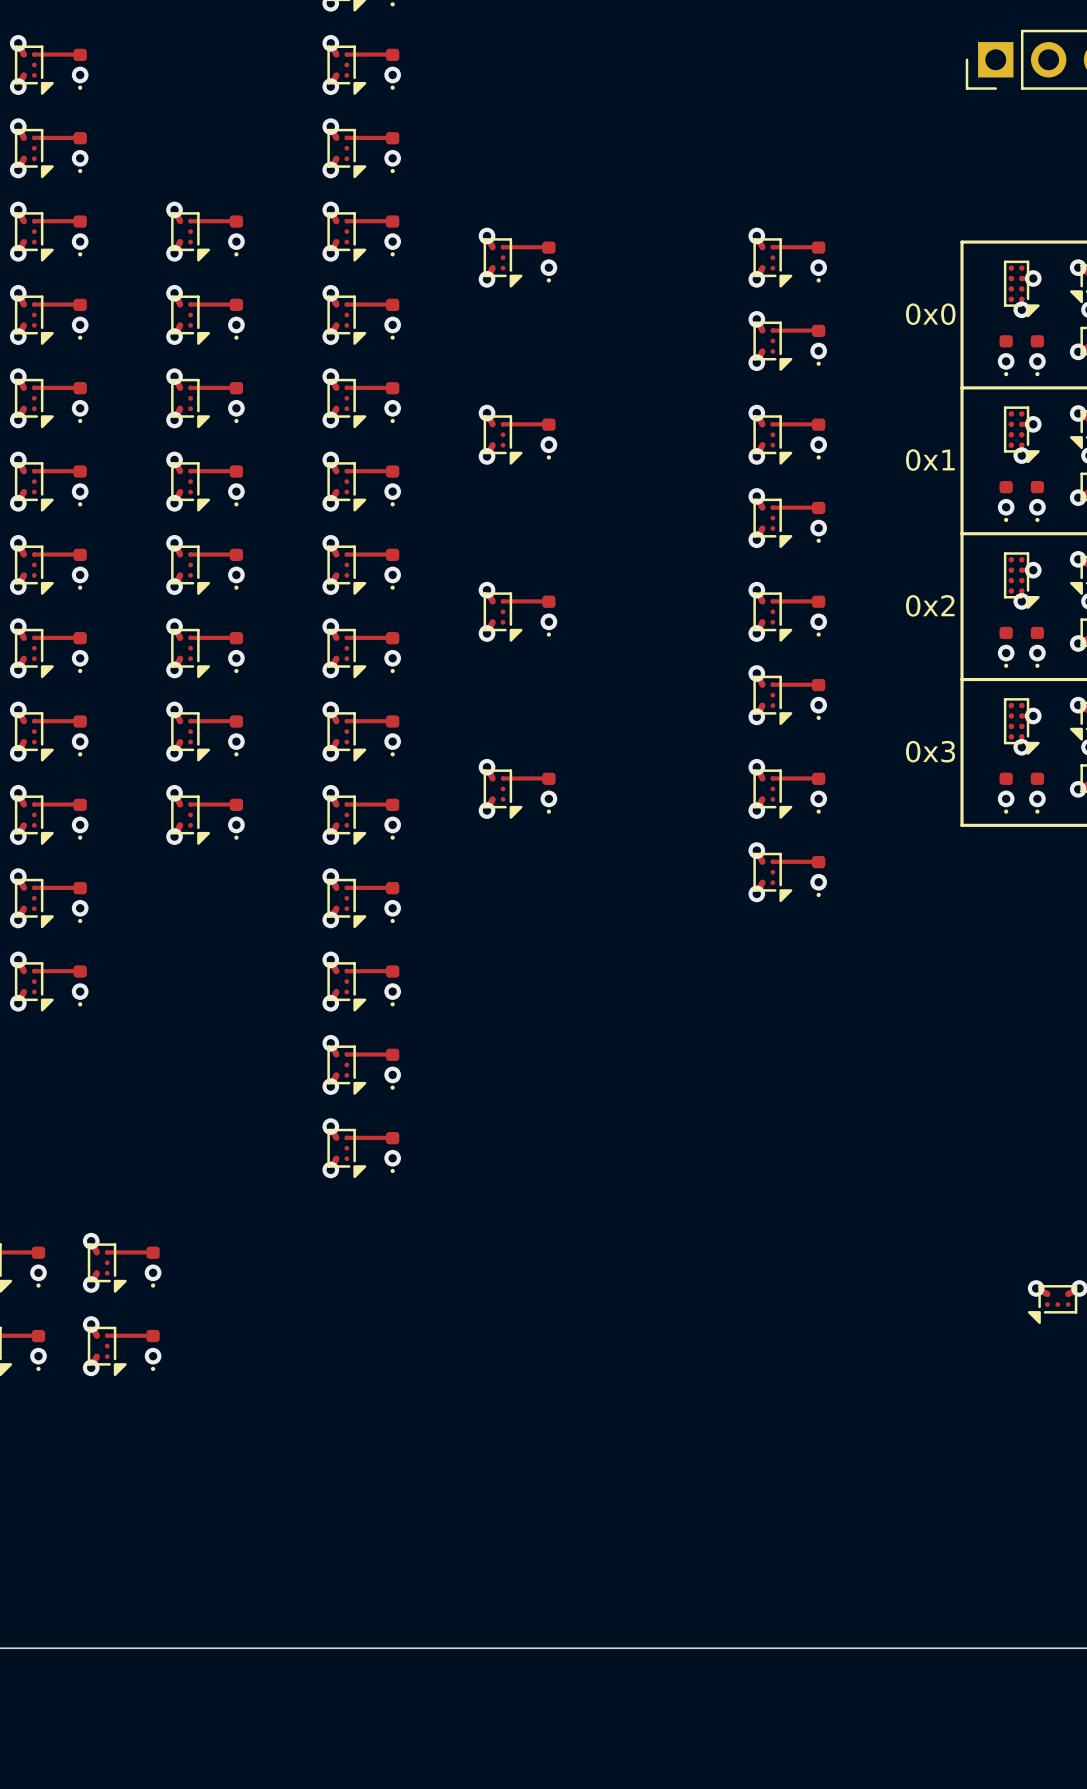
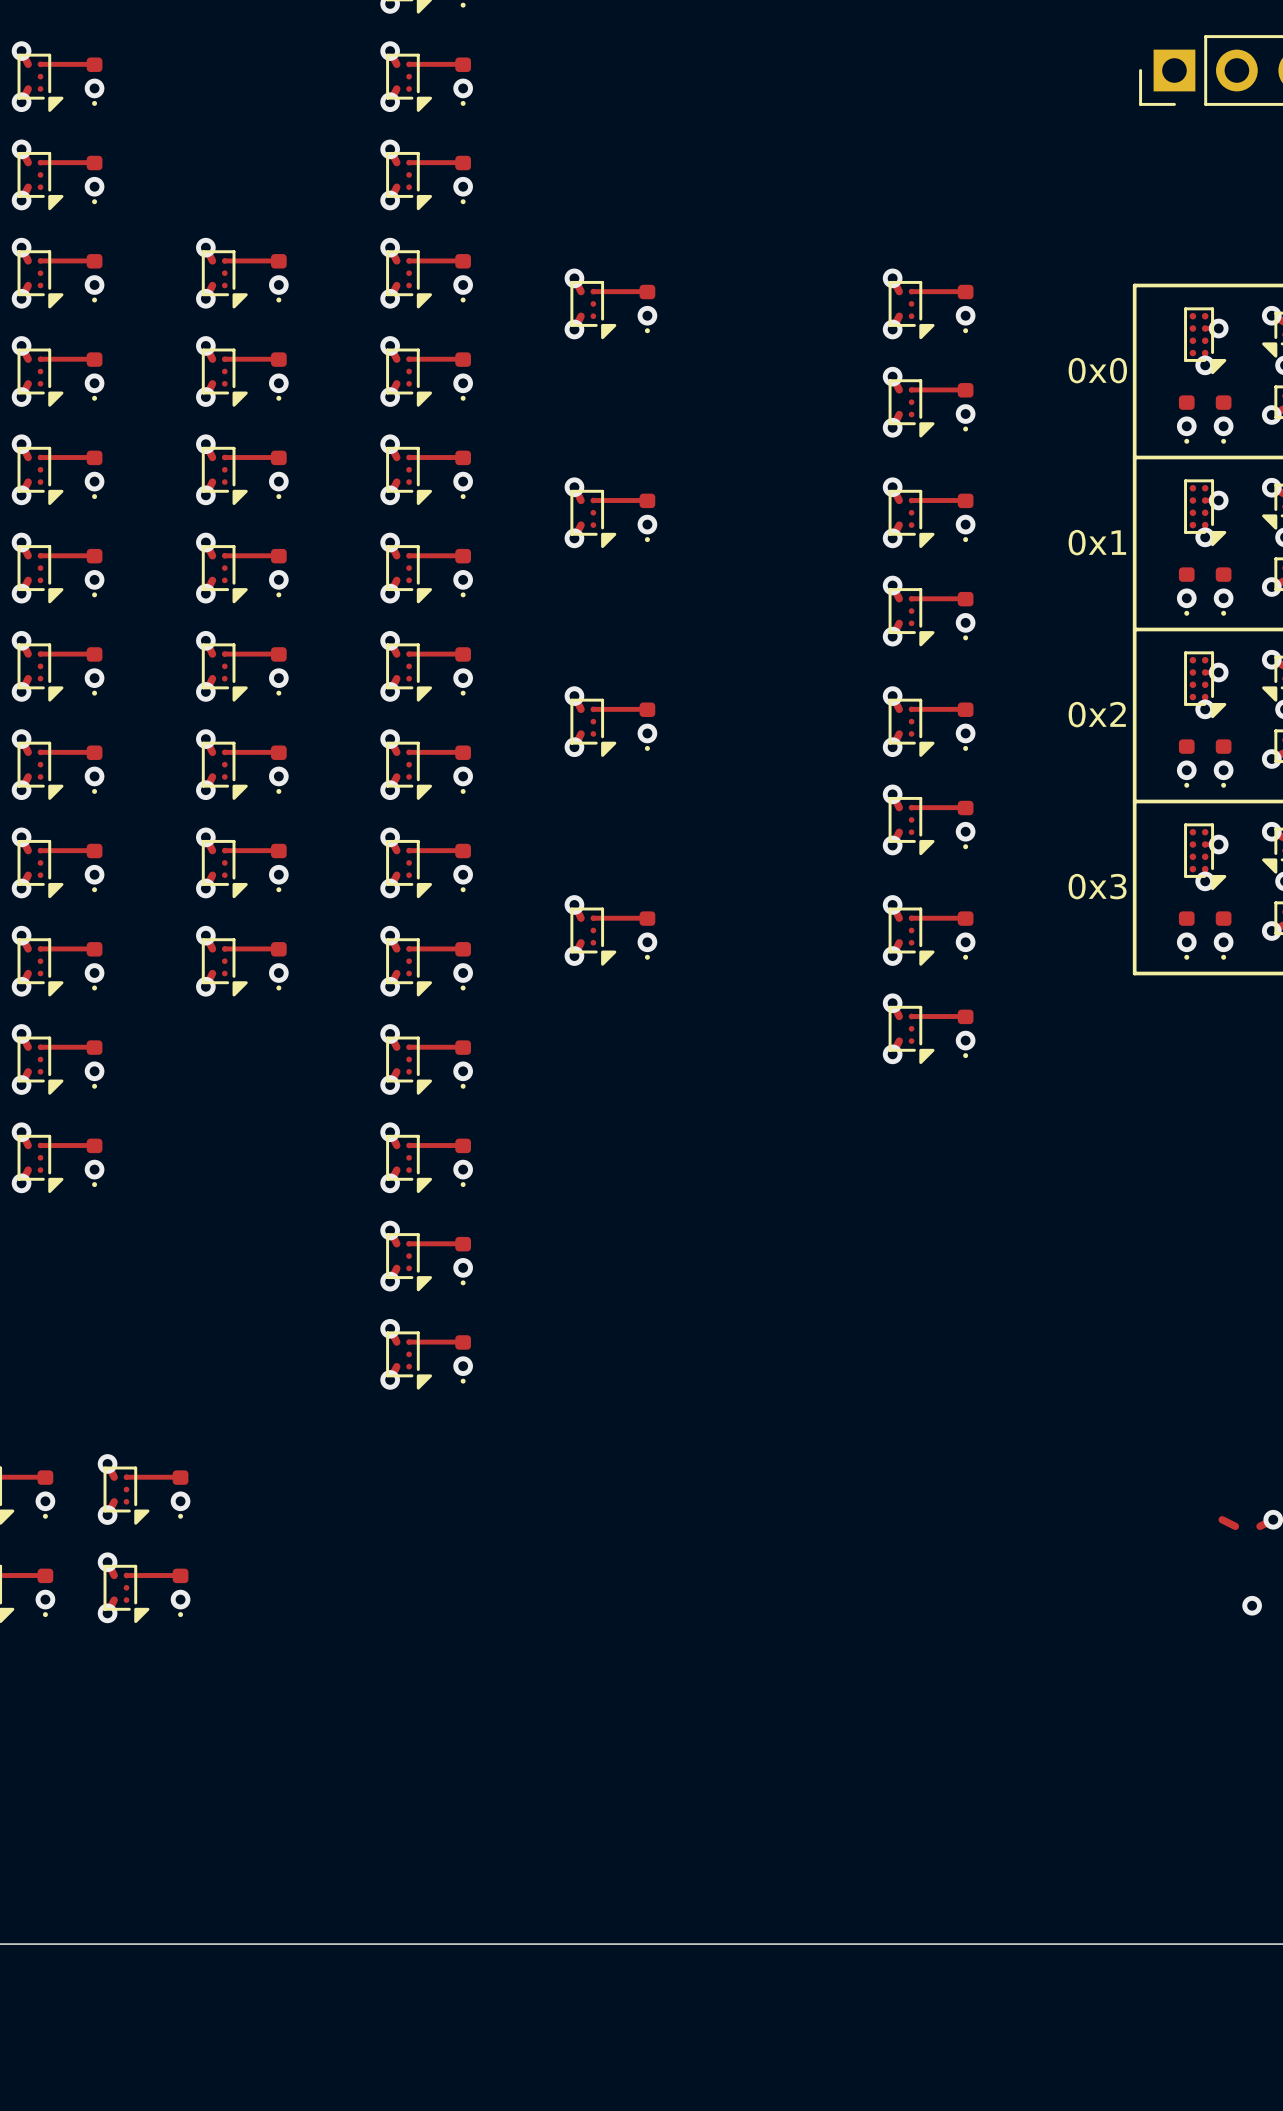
via: (1036, 1288) -> none
part: (1052, 1304) -> none
via: none -> (1252, 1605)

